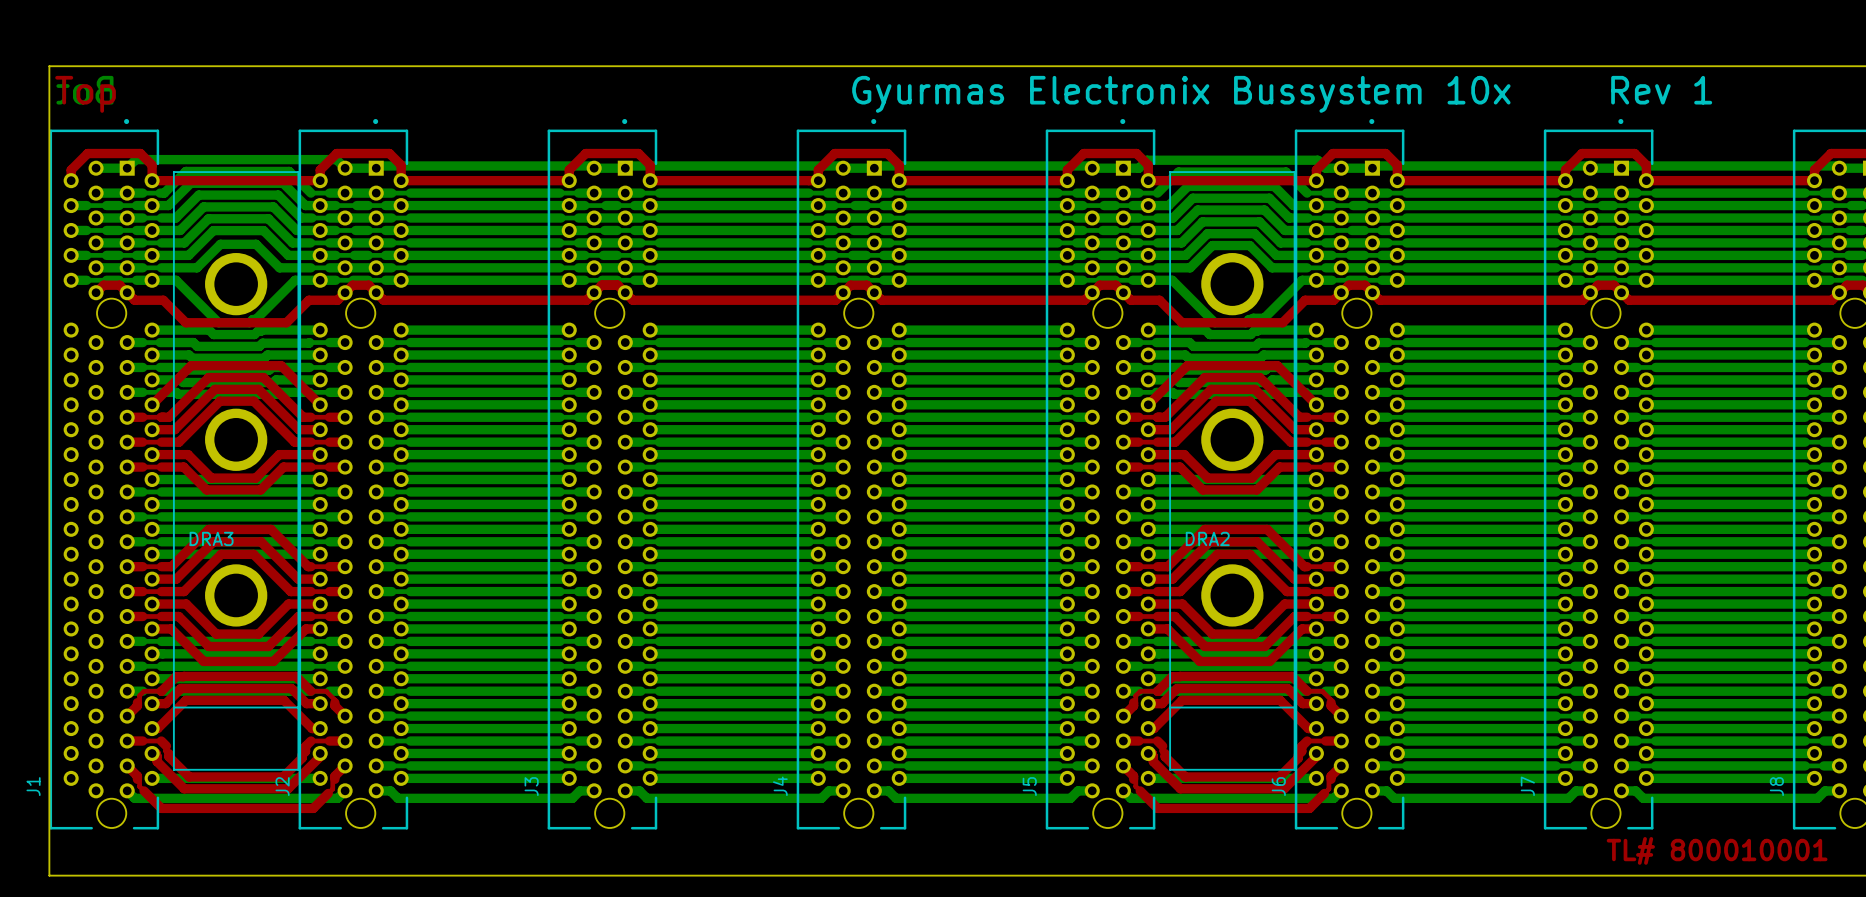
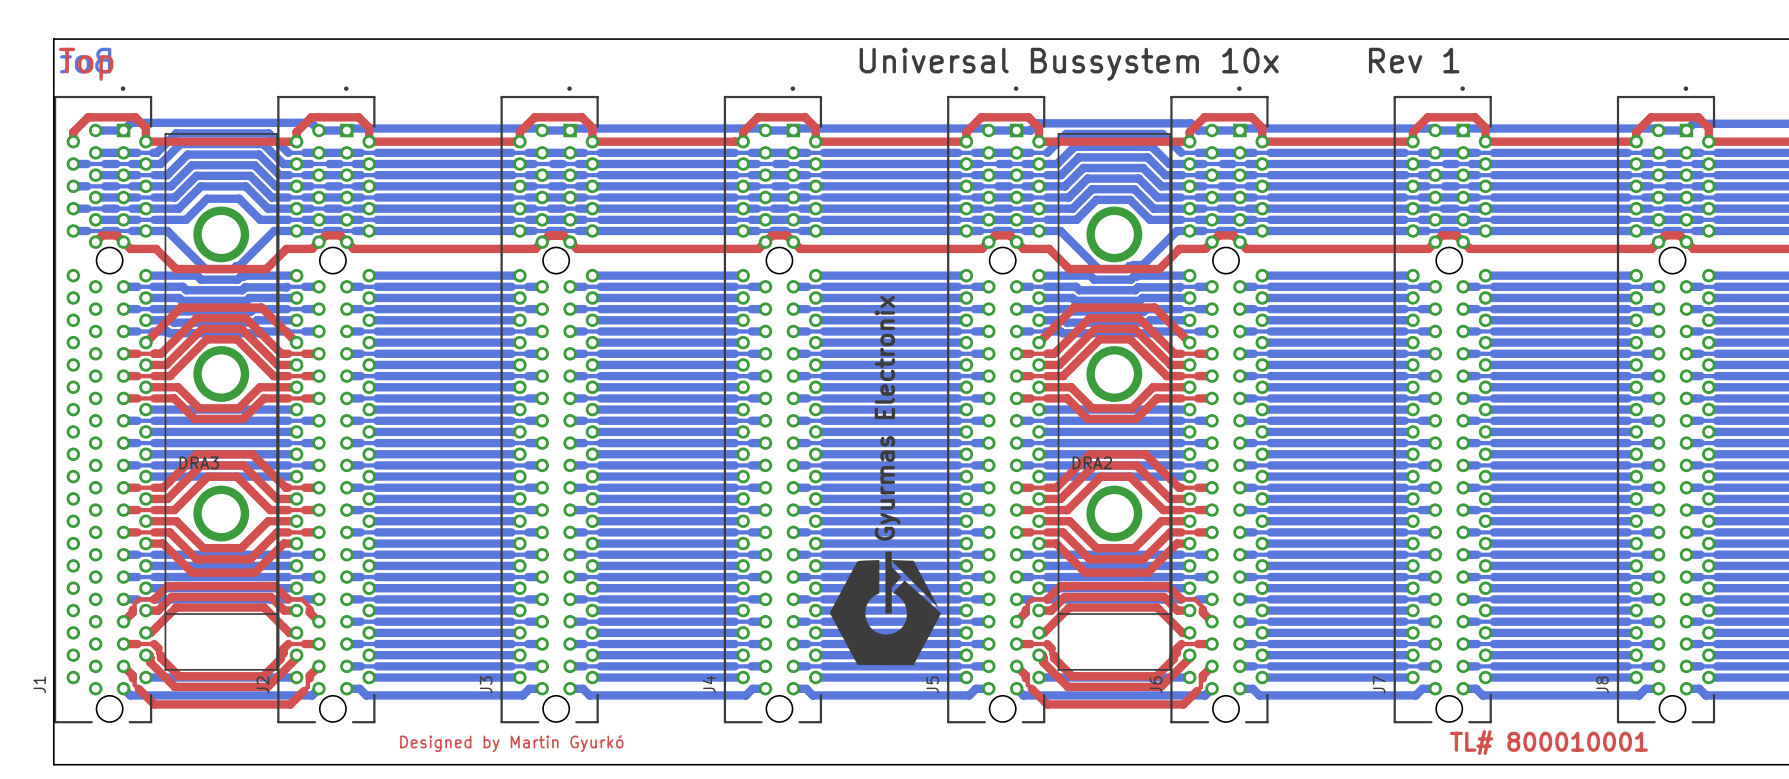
text: Gyurmas Electronix Bussystem 10x Rev 1 (1282, 94) -> Universal Bussystem 10x Rev 1 (1159, 64)
drawing: none -> [829, 551, 941, 666]
text: none -> Designed by Martin Gyurkó (511, 743)

